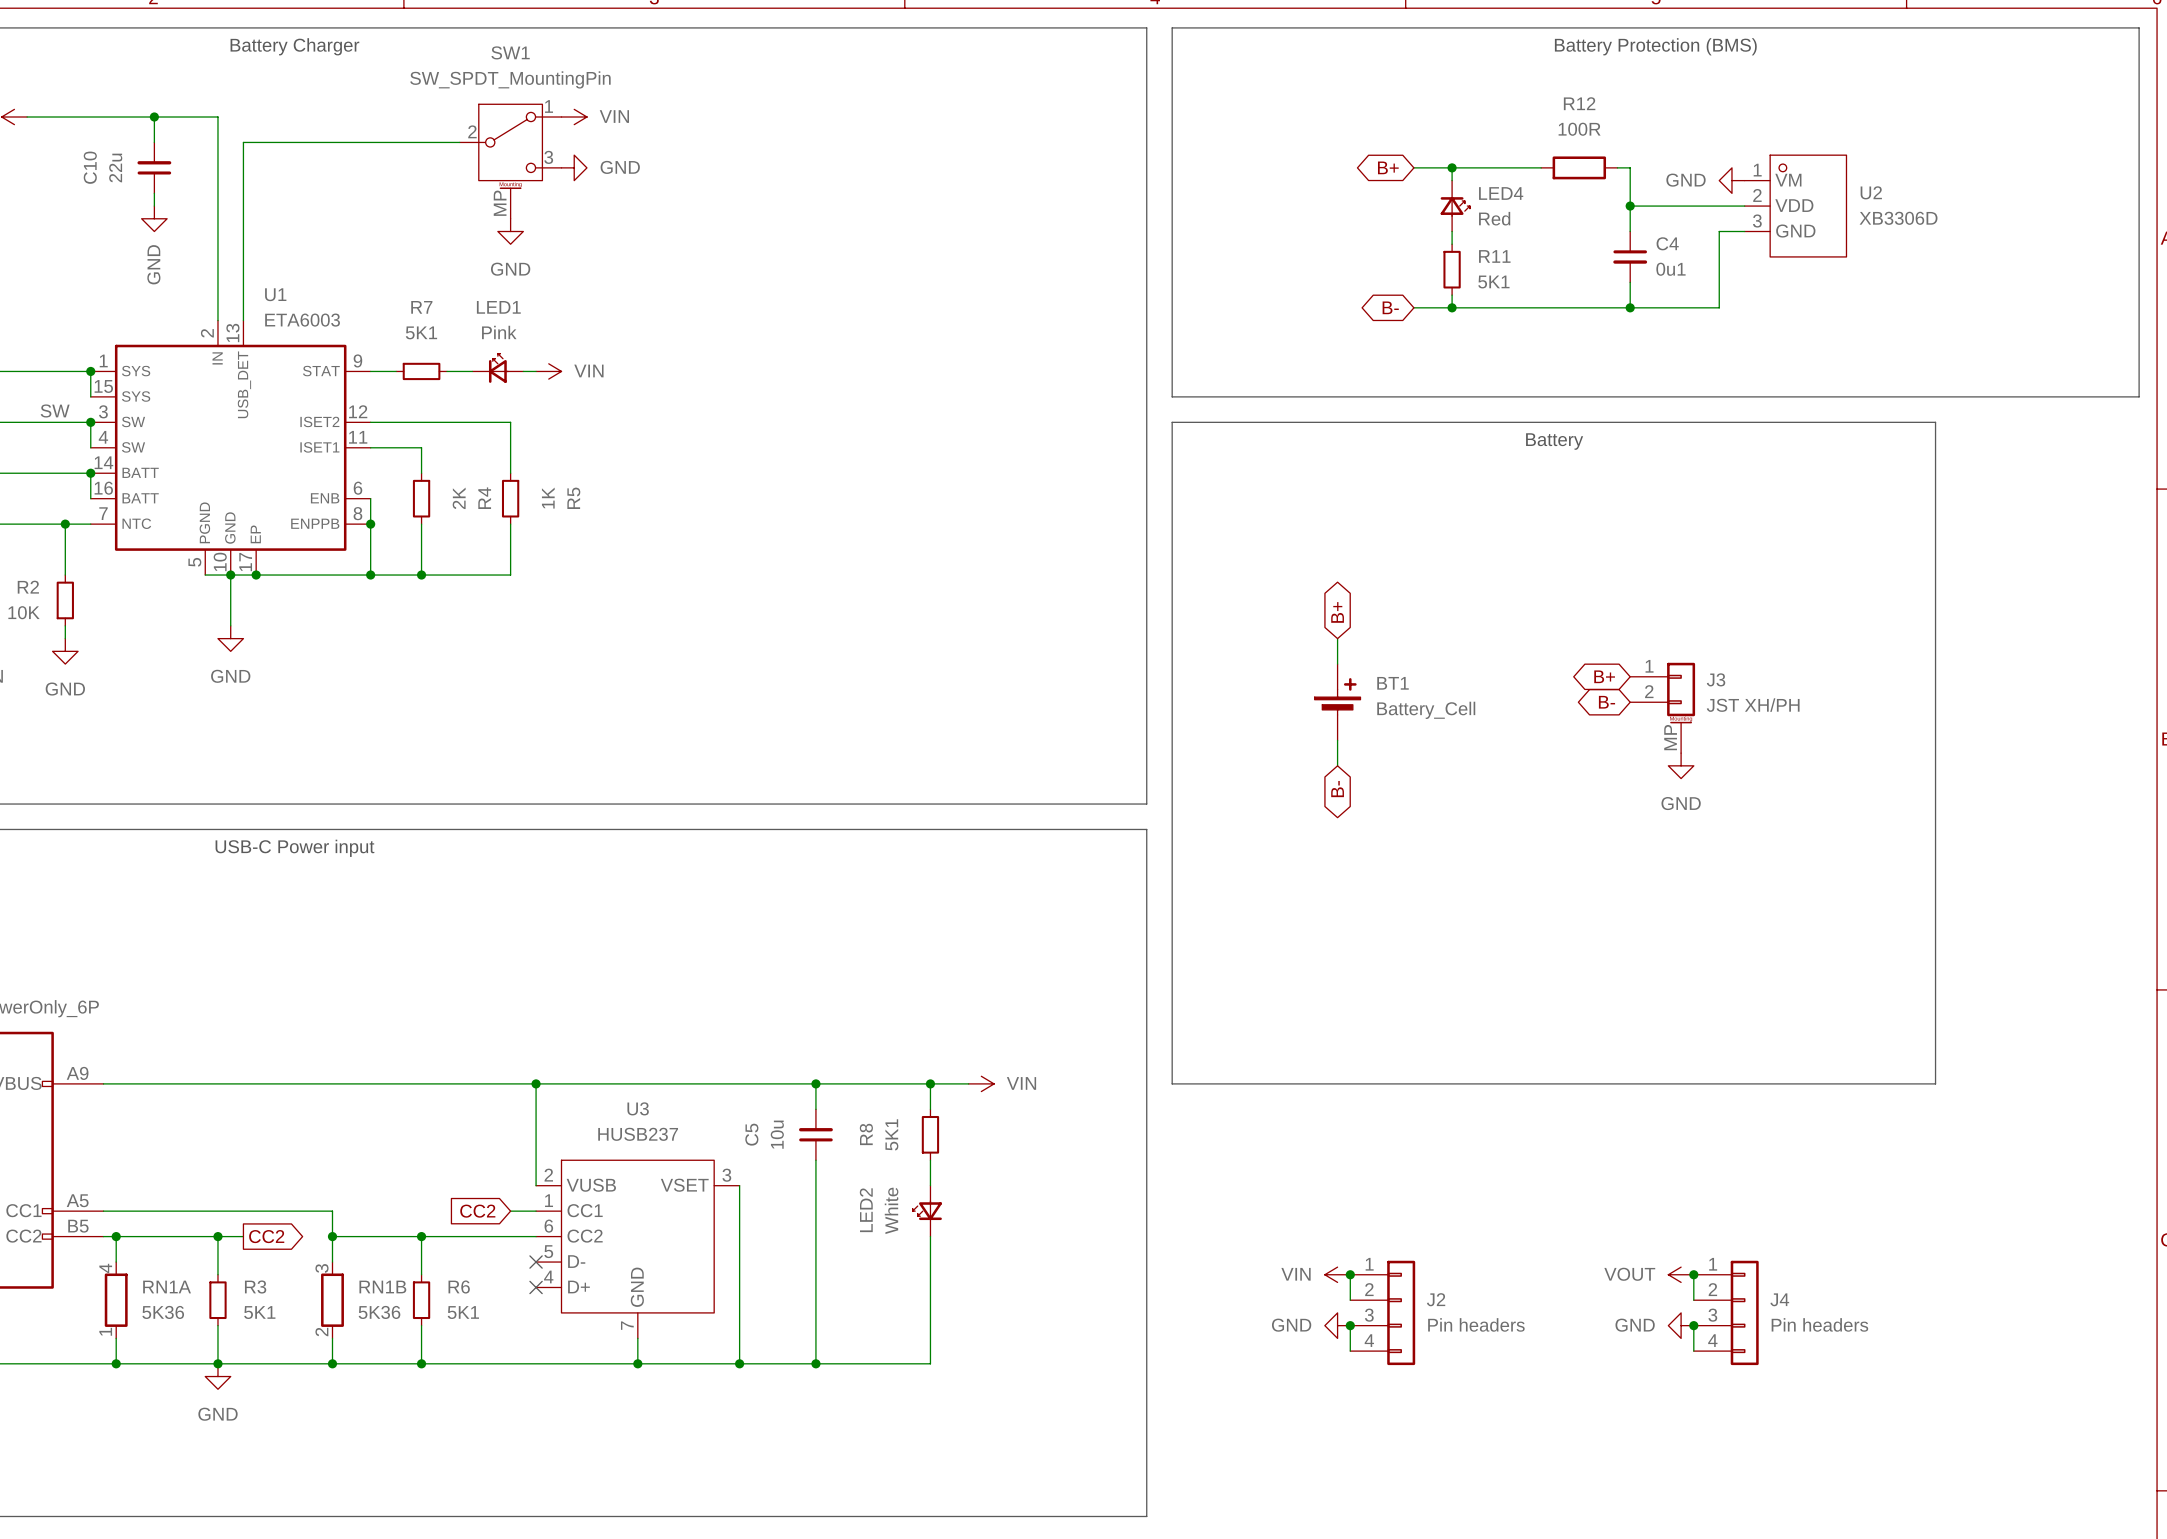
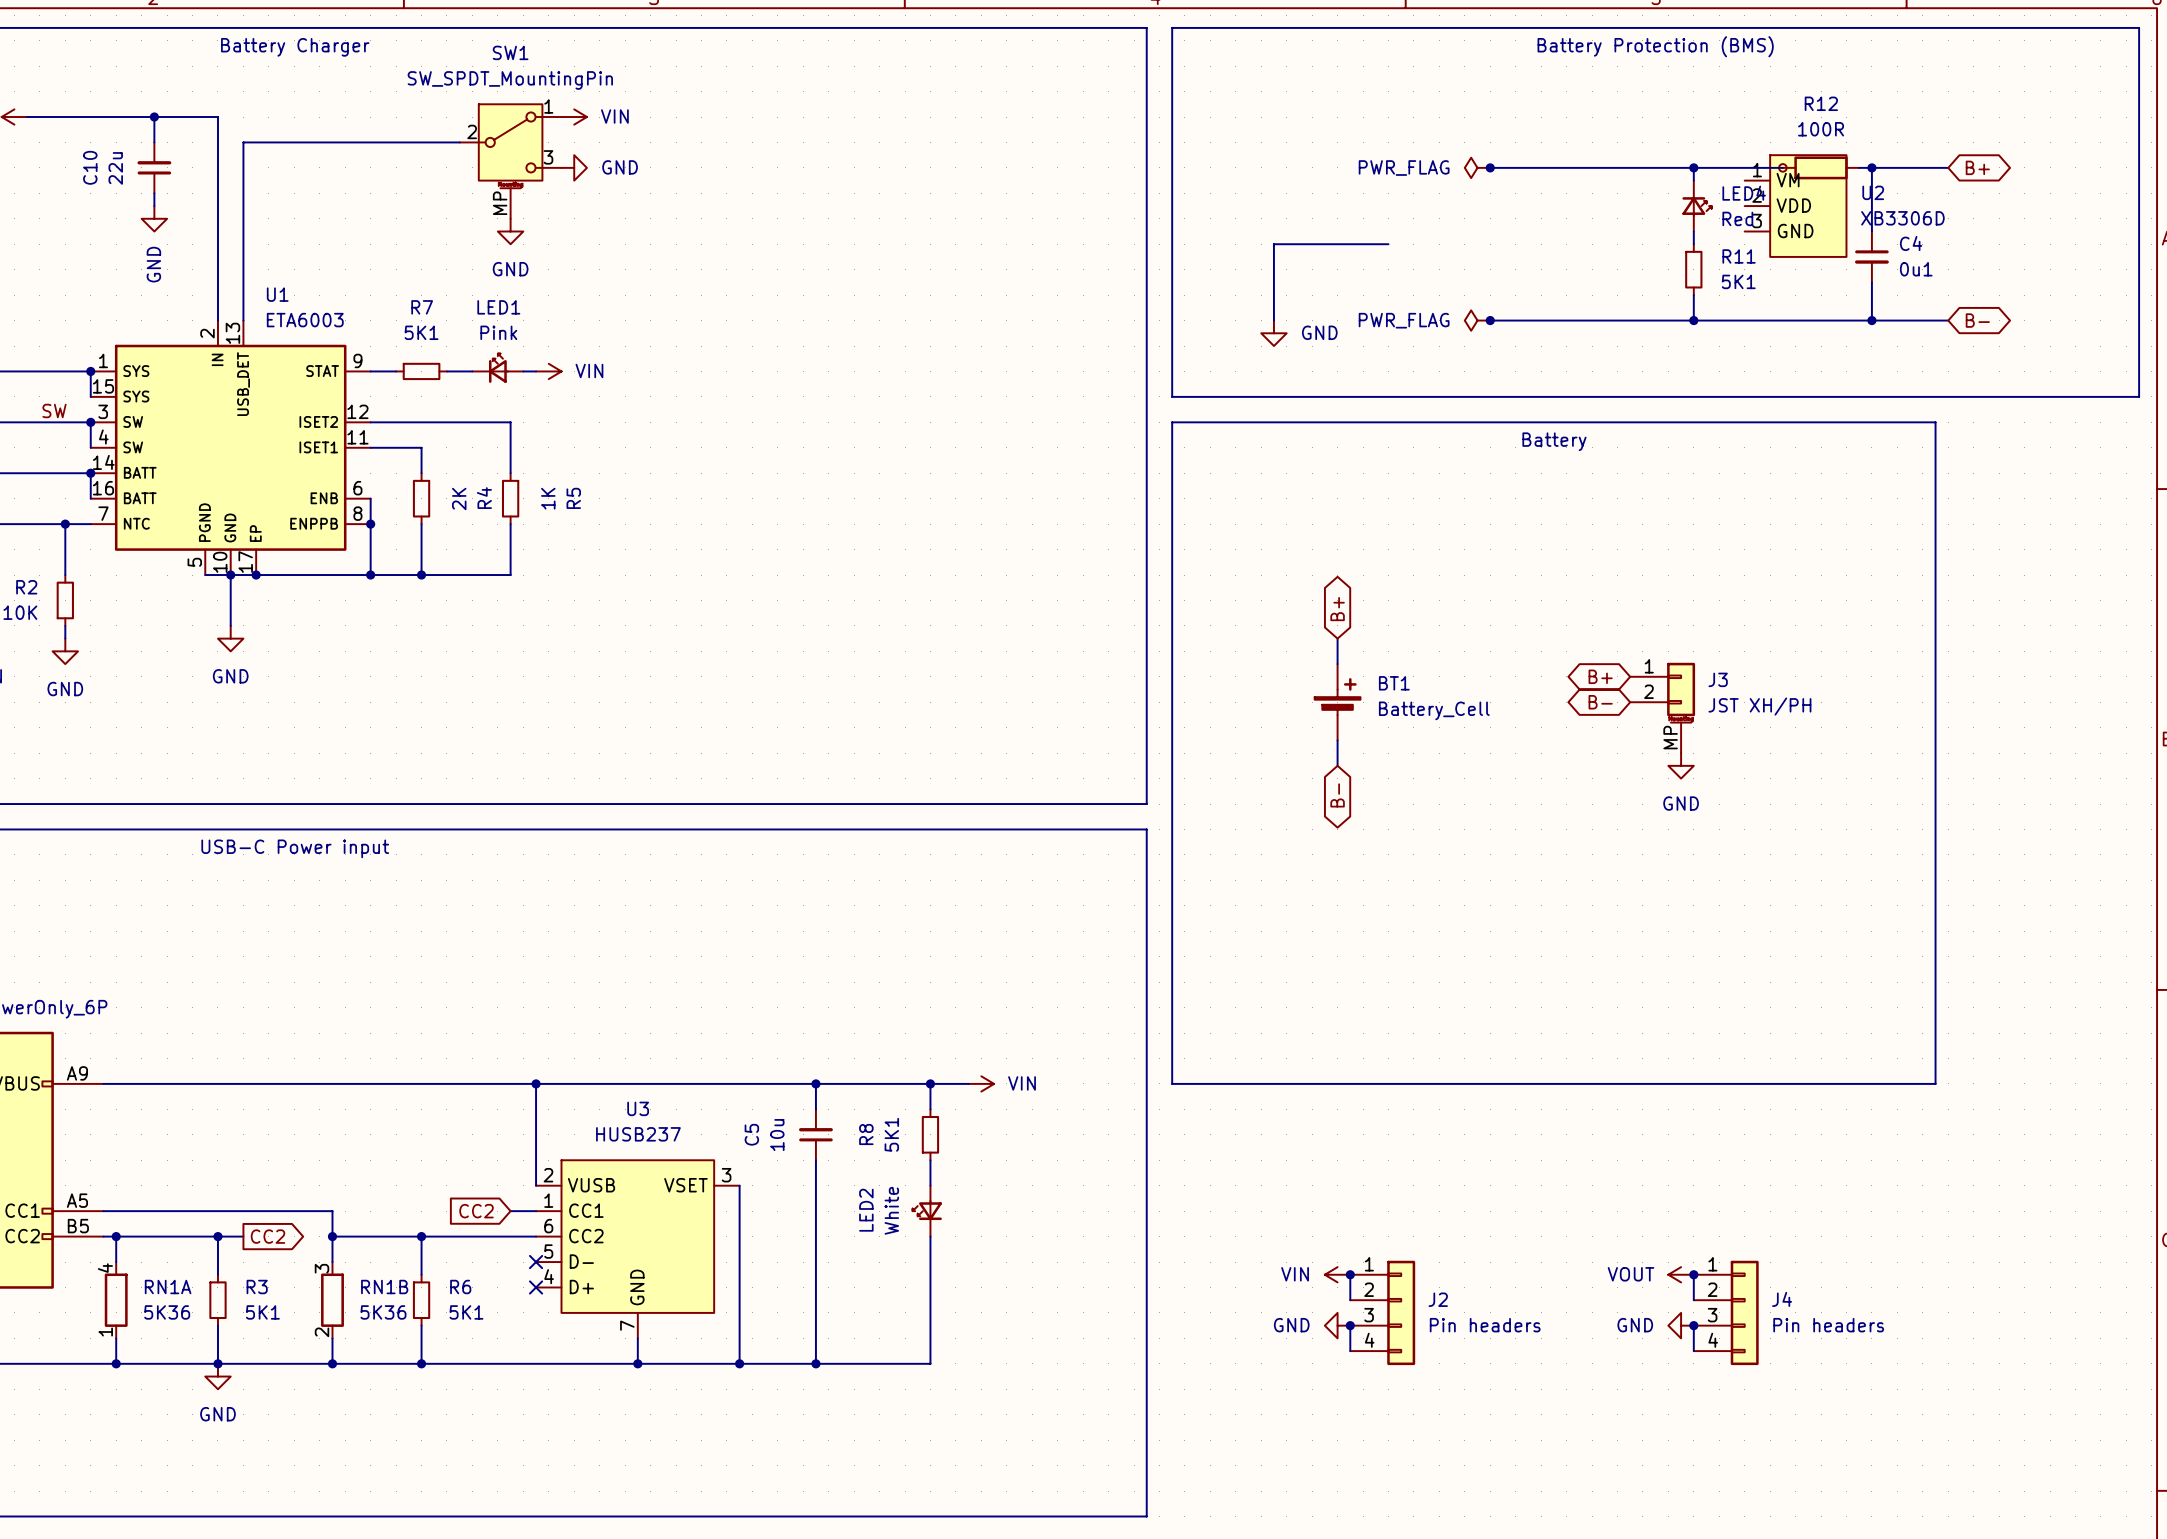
global label: B+ (1388, 167) -> none
wire: (1413, 167) (1490, 167) -> (1541, 167) (1617, 167)
wire: (1452, 167) (1452, 180) -> (1693, 167) (1693, 180)
junction position: (1452, 167) -> (1490, 167)
power symbol: none -> PWR_FLAG (1477, 167)
R12 position: (1579, 167) -> (1821, 167)
wire: (1630, 167) (1630, 231) -> (1630, 167) (1782, 167)
junction: none -> (1693, 167)
wire: none -> (1859, 167) (1948, 167)
wire: none -> (1871, 167) (1871, 231)
junction: none -> (1871, 167)
global label: none -> B+ (1977, 167)
power symbol: GND (1731, 180) -> none
LED4 position: (1455, 206) -> (1696, 206)
wire: (1630, 206) (1744, 206) -> none
junction: (1630, 206) -> none
wire: (1452, 231) (1452, 244) -> (1693, 231) (1693, 244)
wire: (1744, 231) (1719, 231) (1719, 307) (1413, 307) -> none
wire: none -> (1388, 244) (1273, 244) (1273, 320)
C4 position: (1630, 256) -> (1871, 256)
R11 position: (1452, 269) -> (1693, 269)
wire: (1630, 282) (1630, 307) -> (1693, 295) (1693, 320)
wire: none -> (1871, 282) (1871, 320)
wire: (1452, 295) (1452, 307) -> none
global label: B- (1390, 307) -> none
junction position: (1452, 307) -> (1490, 320)
junction: (1630, 307) -> none
power symbol: none -> PWR_FLAG (1477, 320)
wire: none -> (1490, 320) (1948, 320)
junction: none -> (1693, 320)
junction: none -> (1871, 320)
global label: none -> B- (1977, 320)
power symbol: none -> GND (1273, 333)

